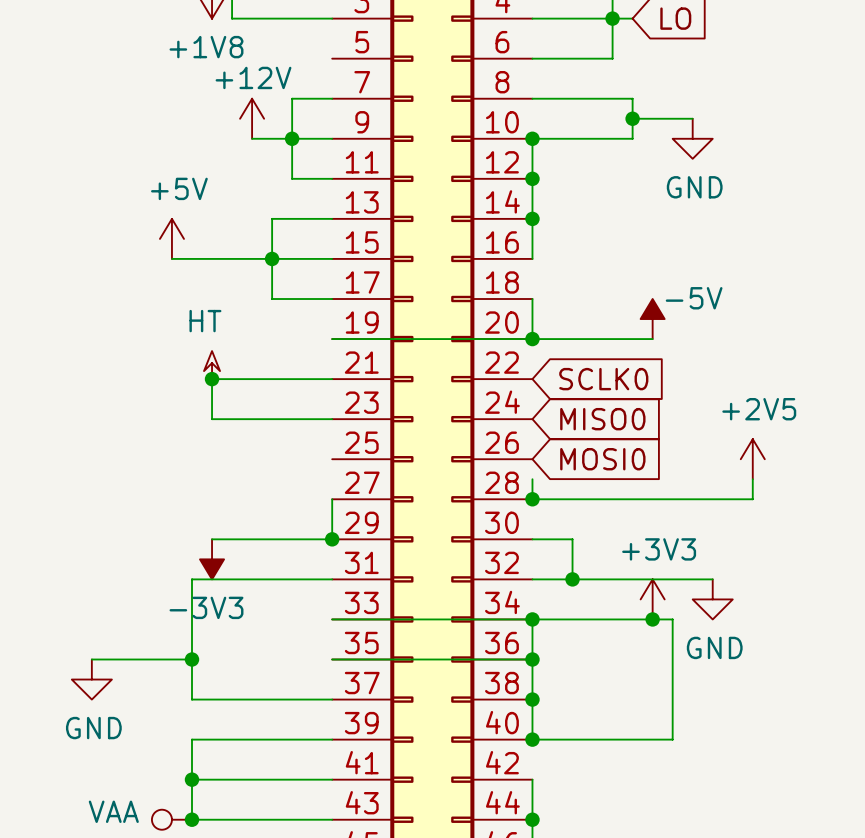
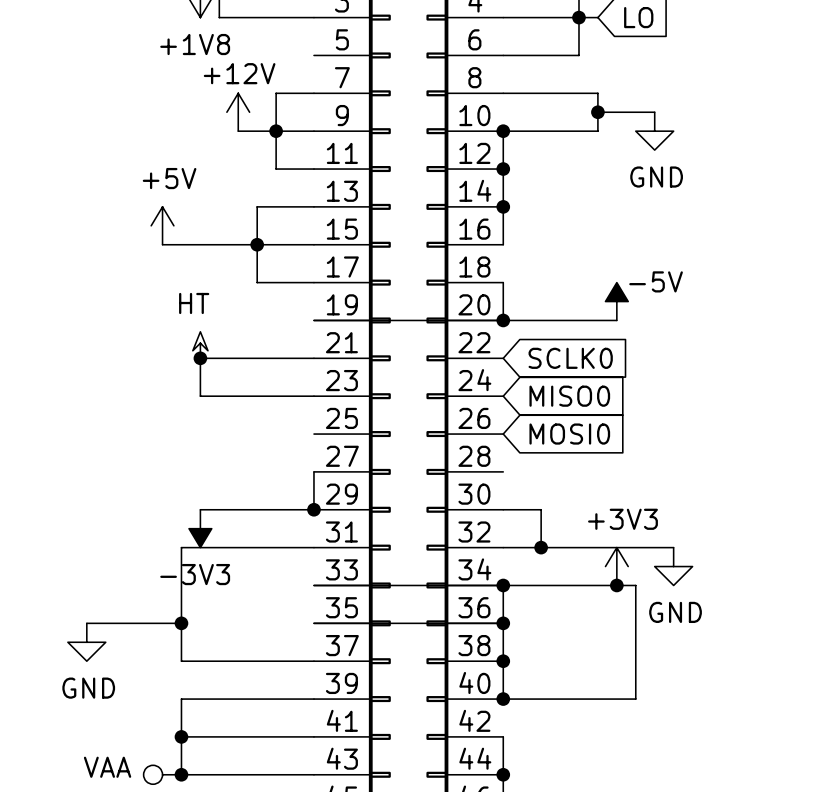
power symbol: +2V5 (752, 459) -> none
wire: (532, 479) (532, 499) (752, 499) (752, 479) -> none
junction: (532, 499) -> none

